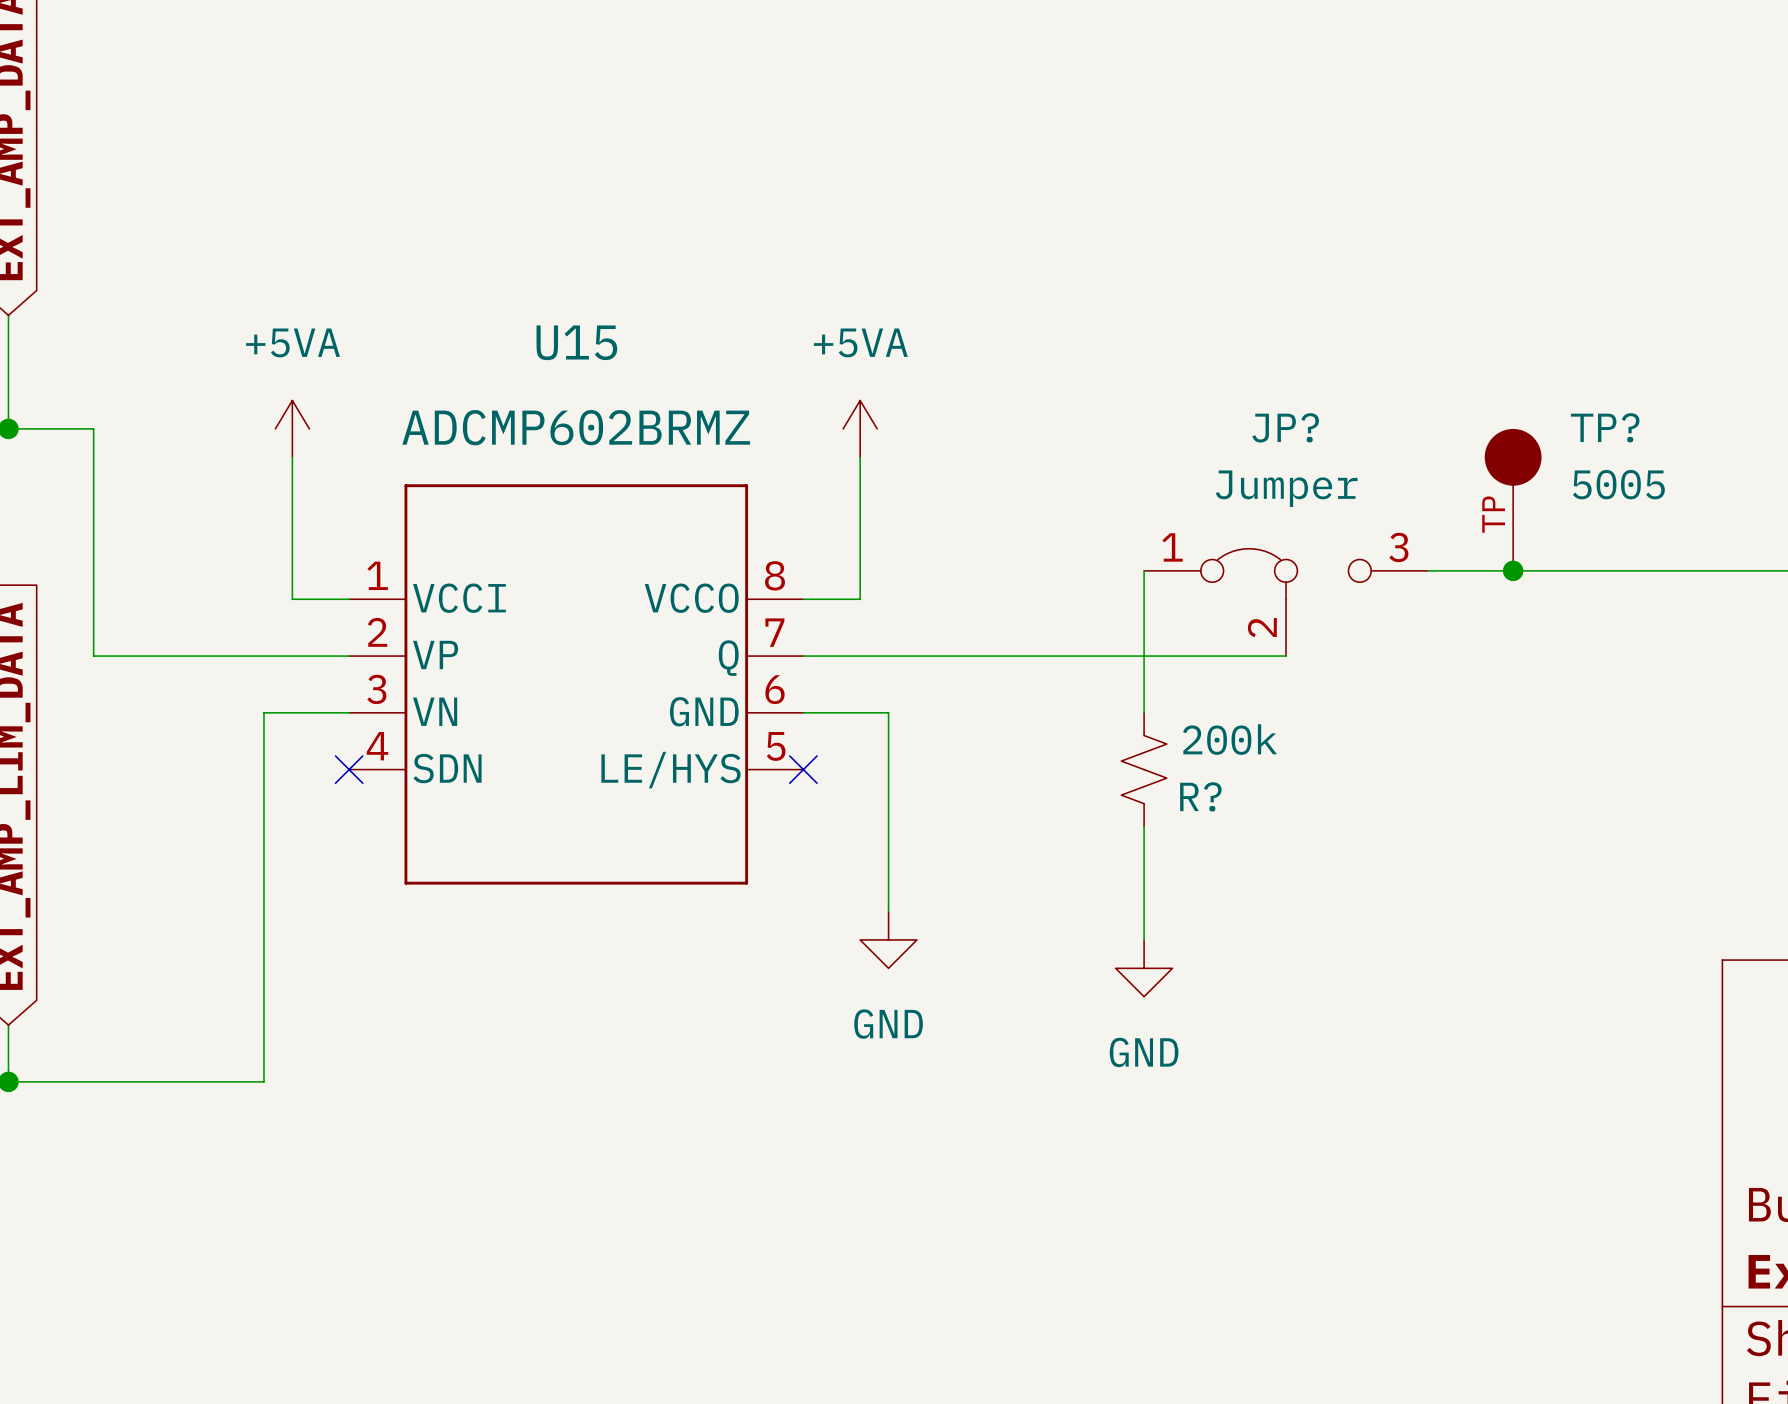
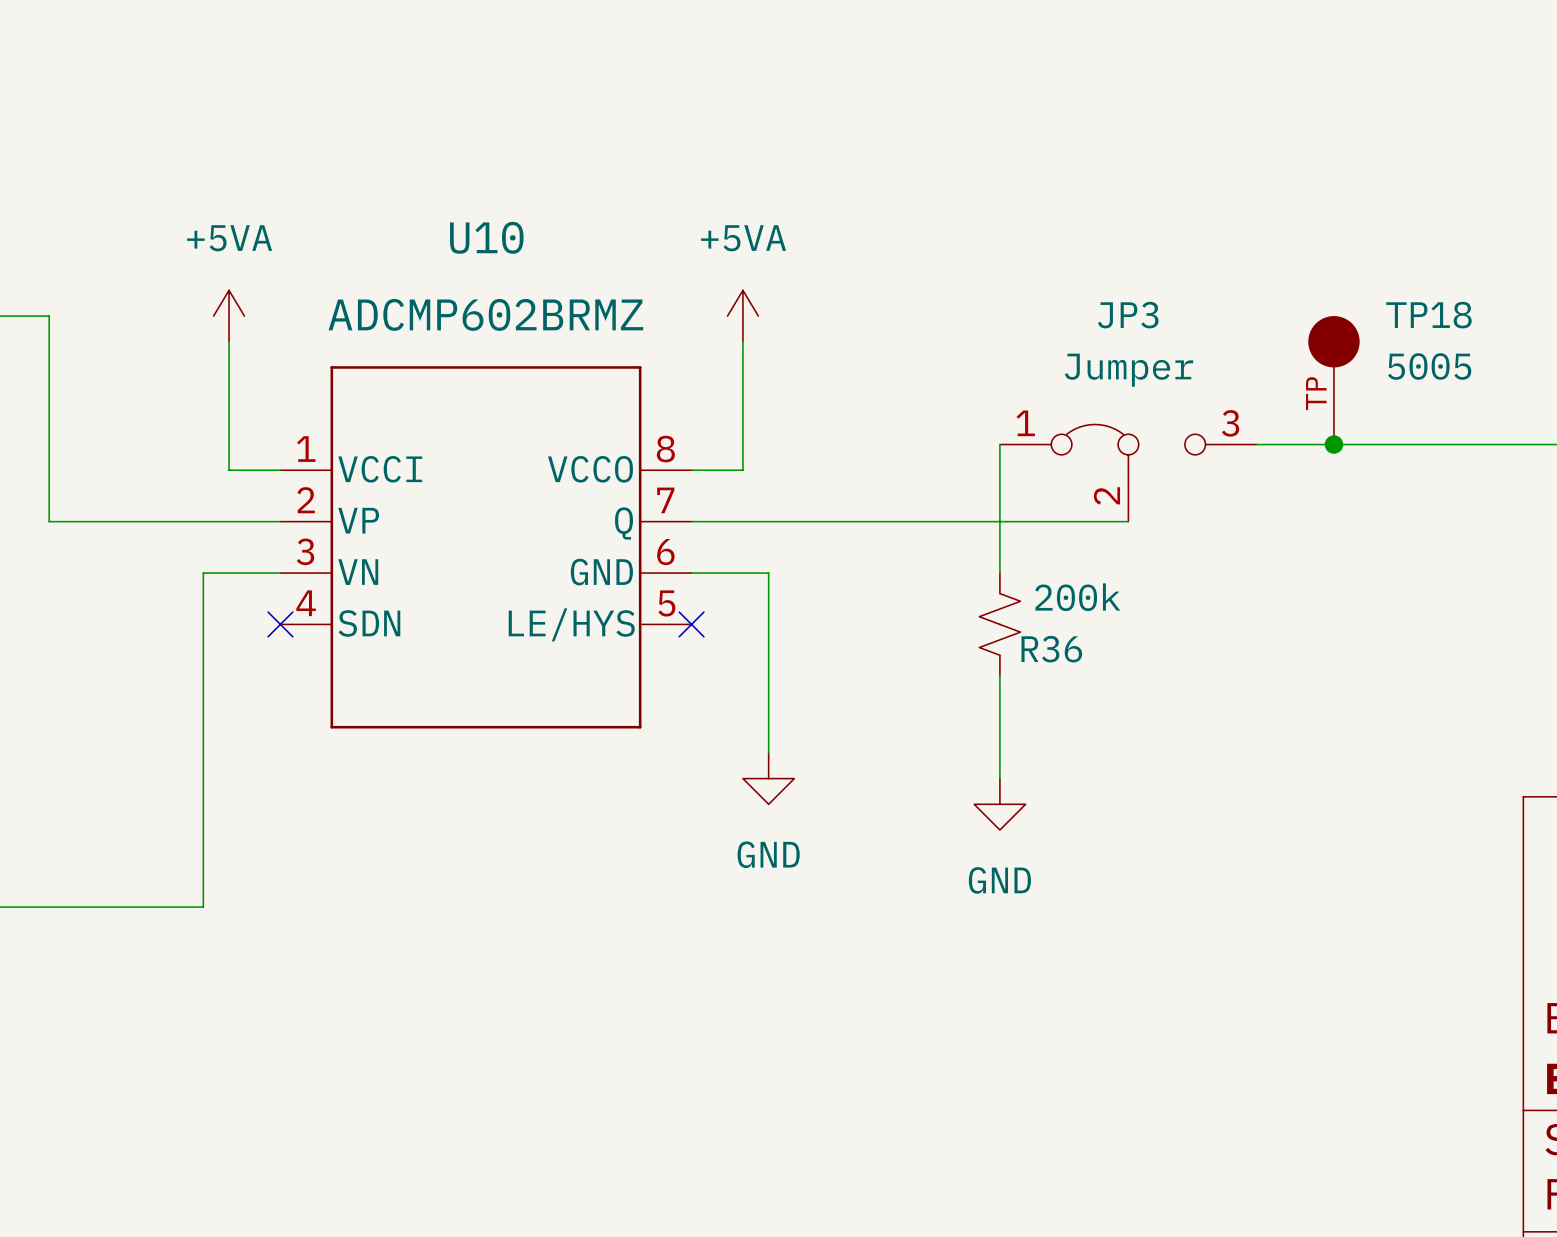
U15 name: U15 (576, 342) -> U10 (486, 237)
JP? name: JP? (1285, 427) -> JP3 (1128, 315)
TP? name: TP? (1605, 427) -> TP18 (1428, 315)
R? name: R? (1200, 796) -> R36 (1051, 649)

